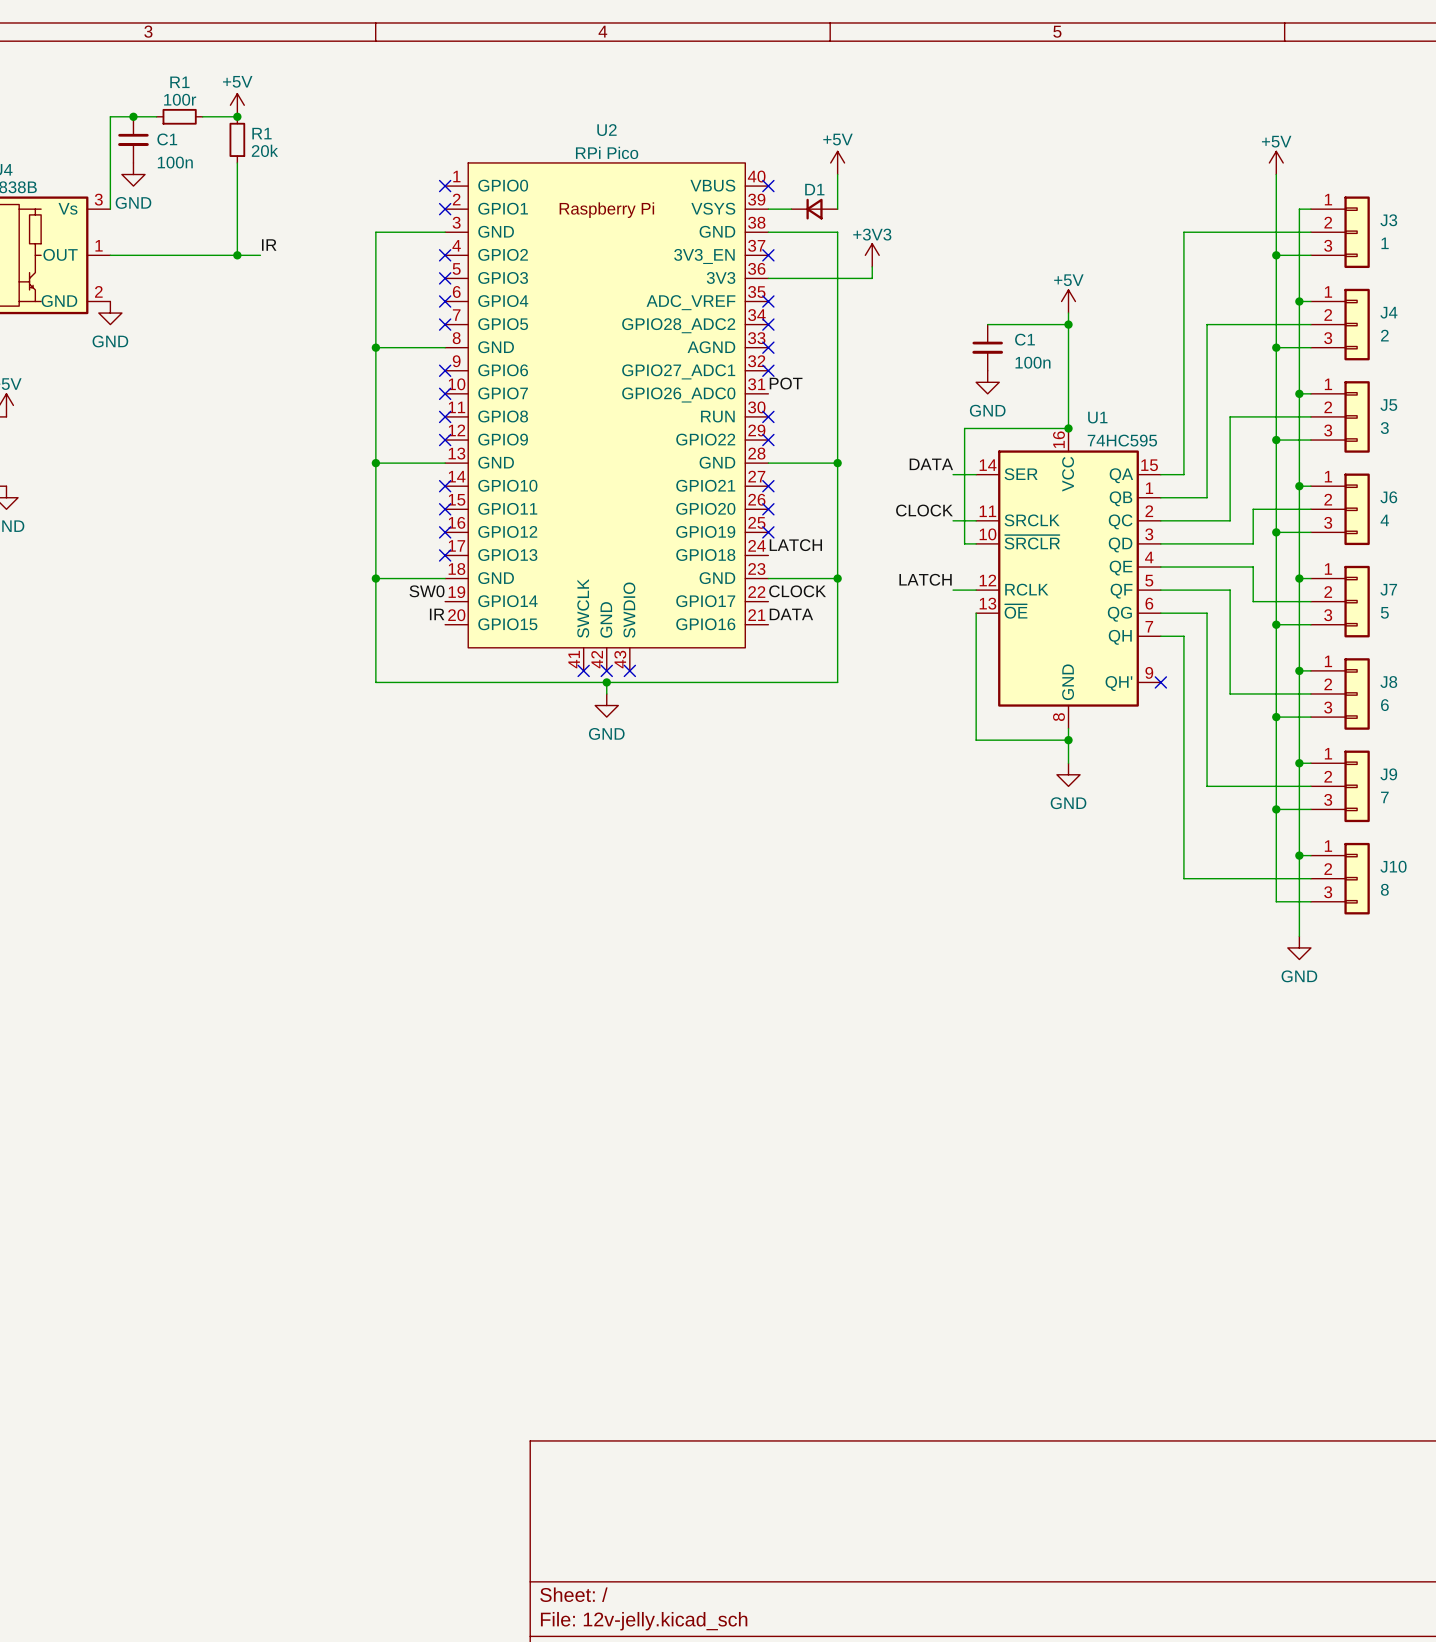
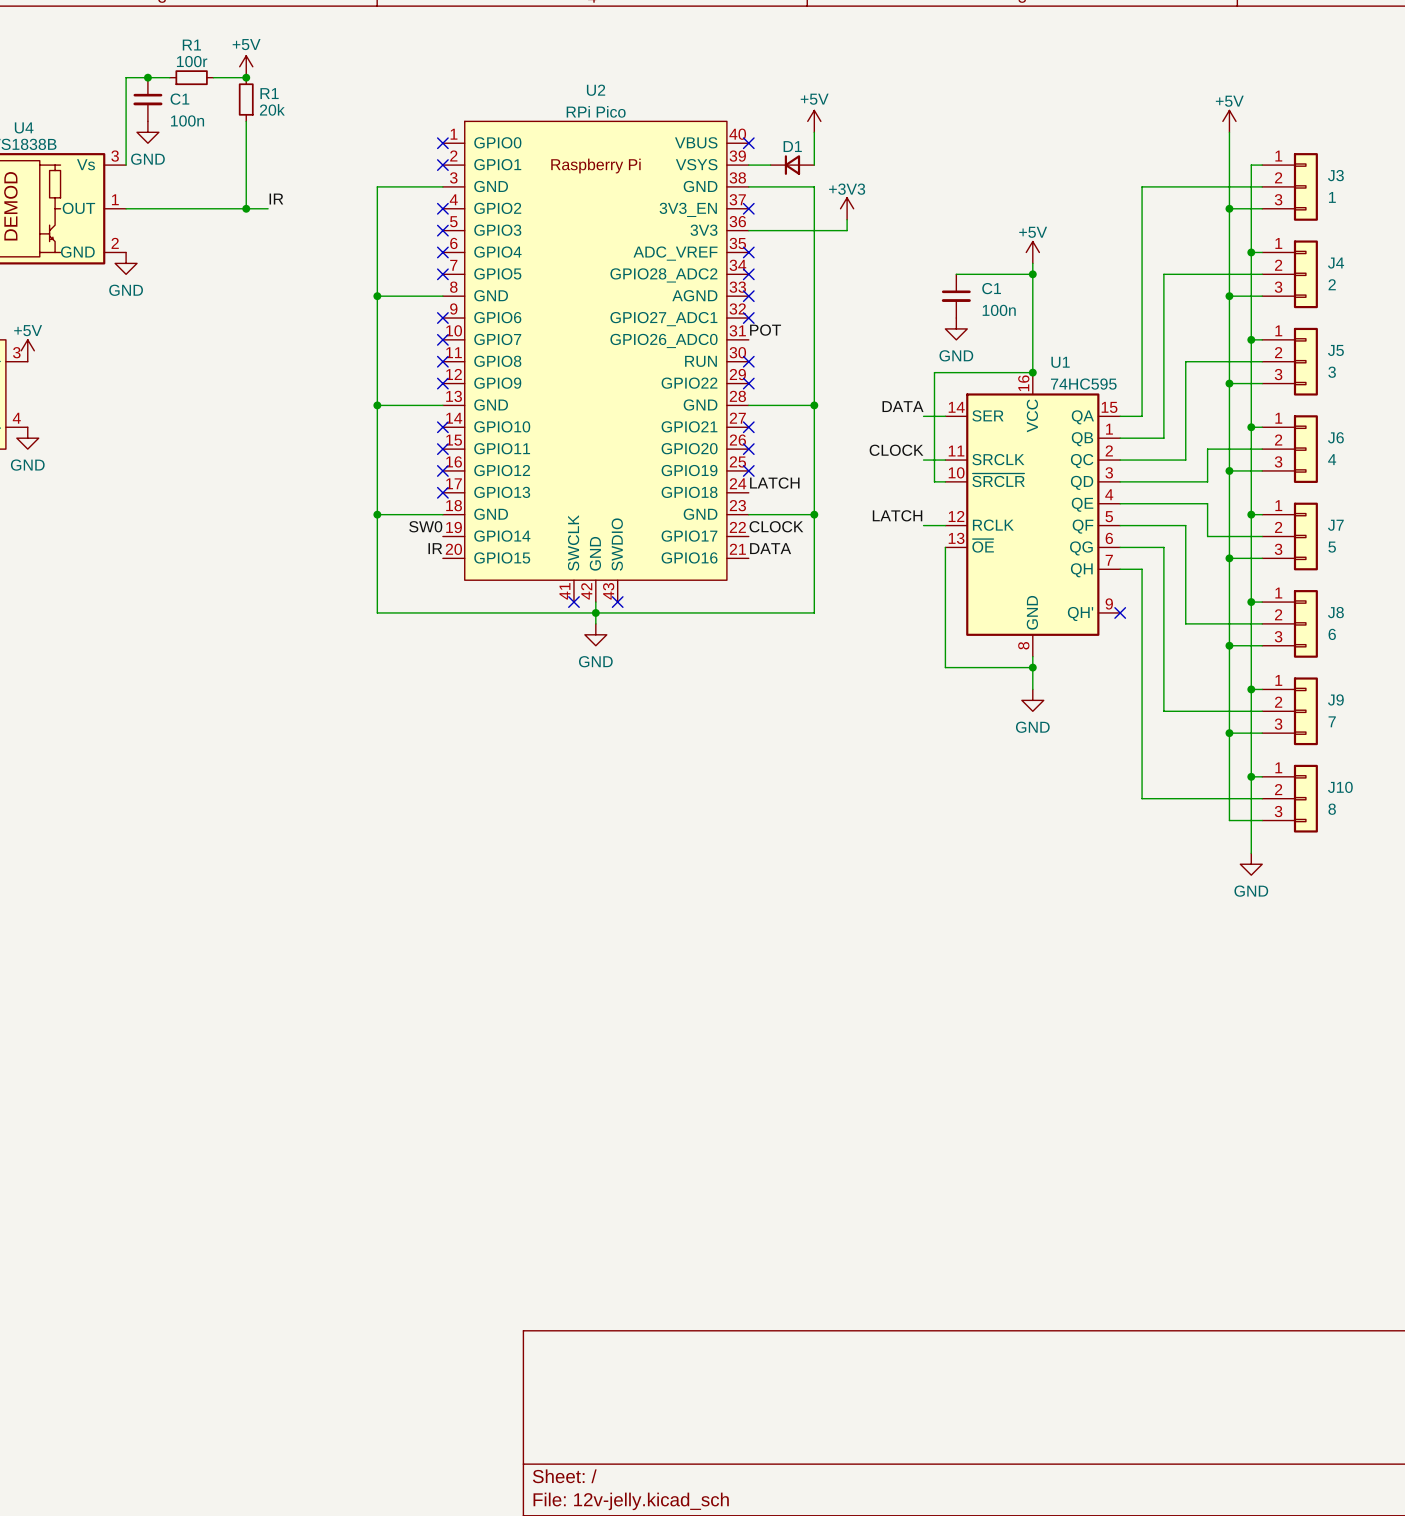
wire: none -> (595, 602) (595, 612)
no-connect mark: (606, 670) -> none

